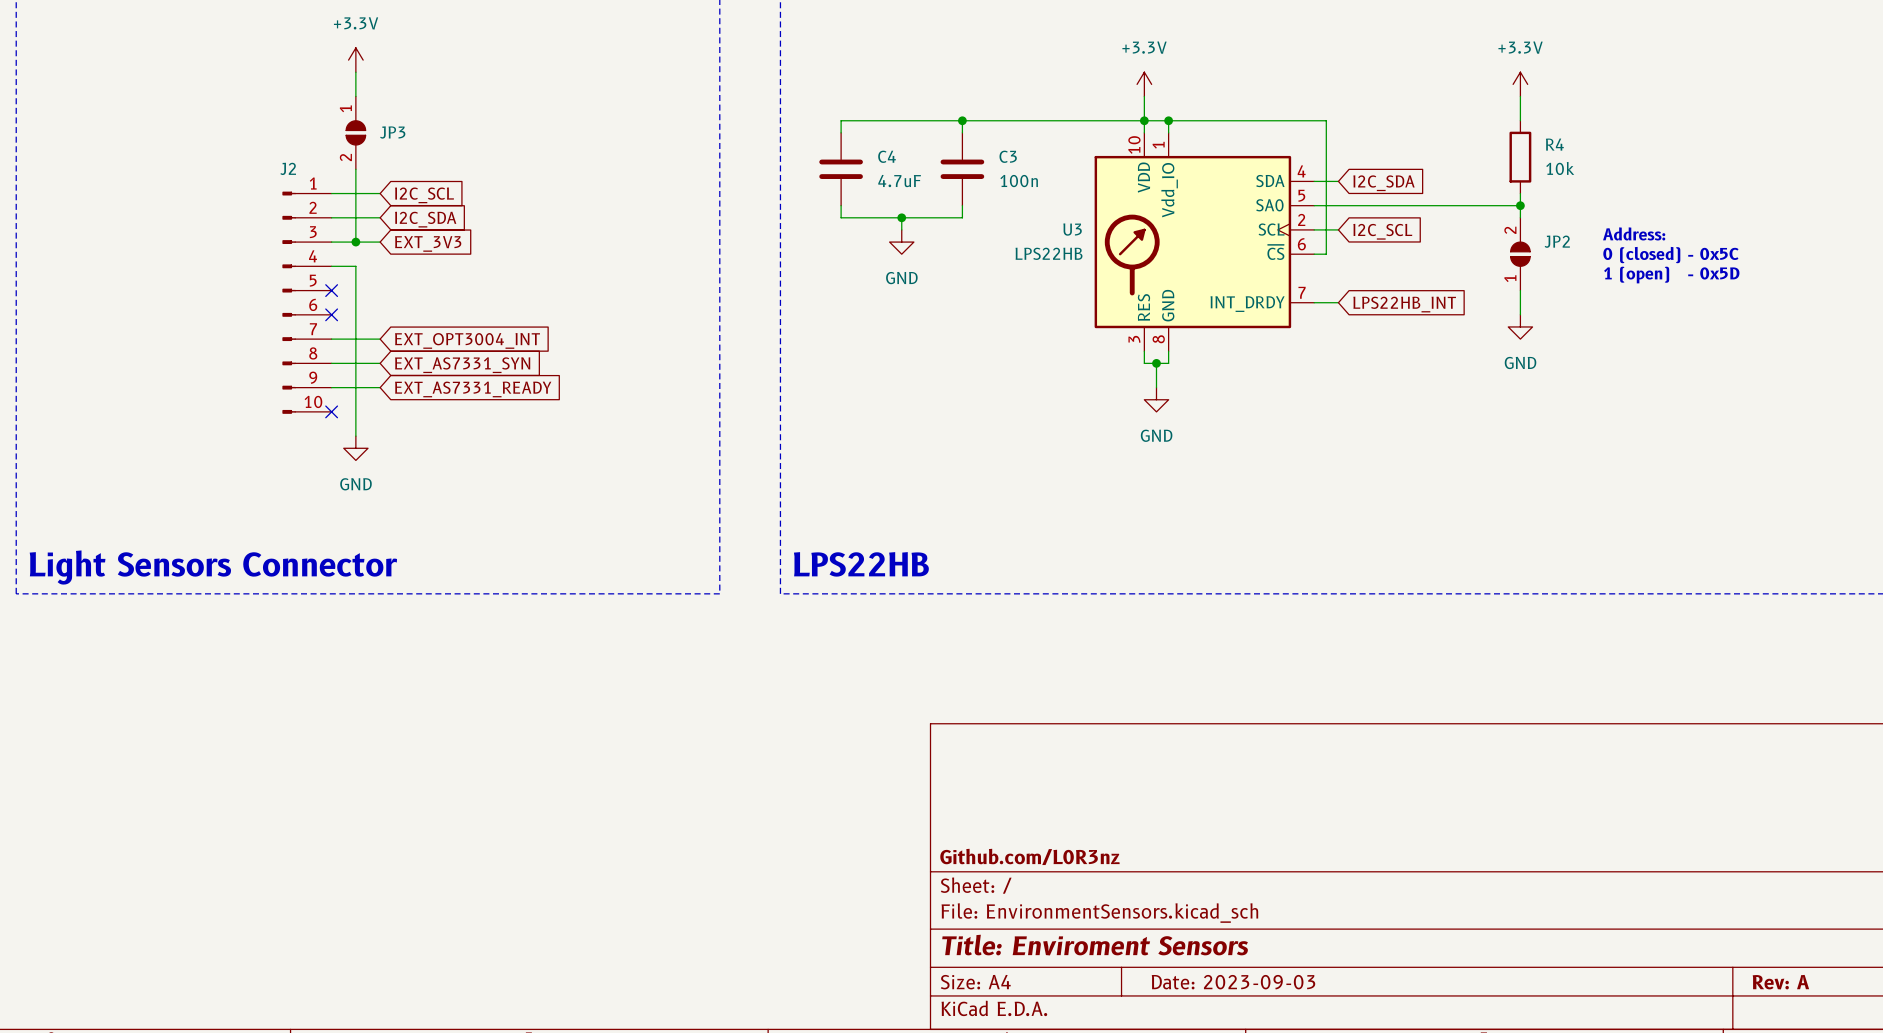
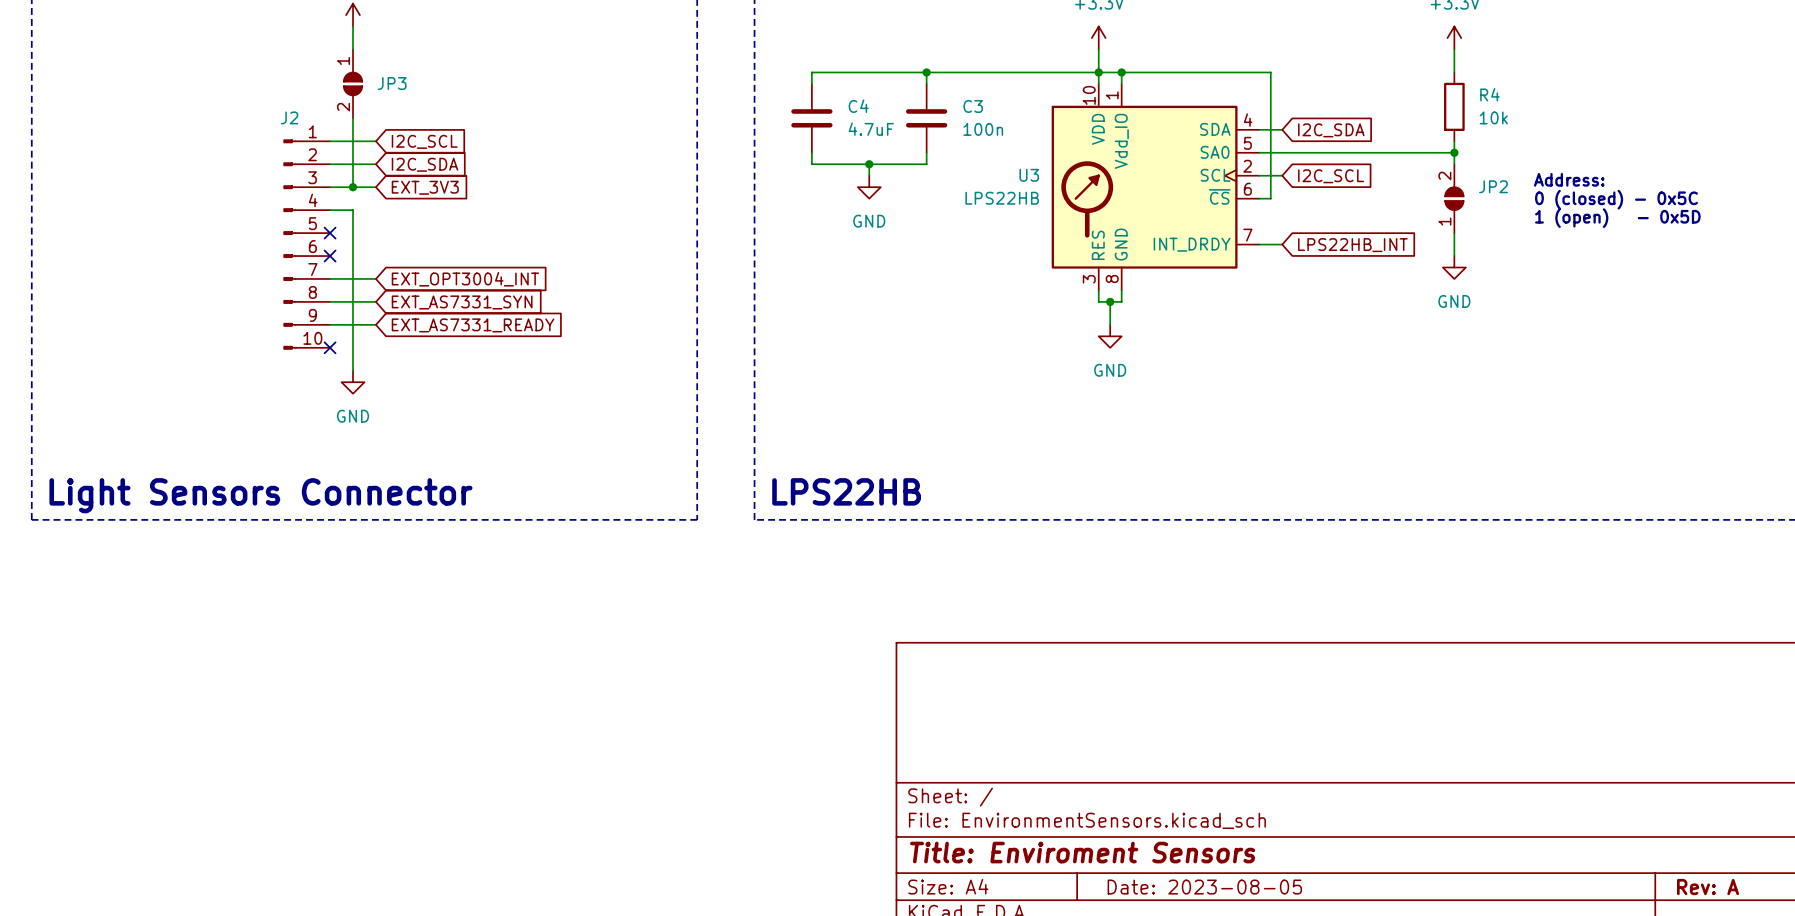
title block: Github.com/L0R3nz (1029, 856) -> none
title block: Date: 2023-09-03 (1233, 982) -> Date: 2023-08-05 (1204, 887)

